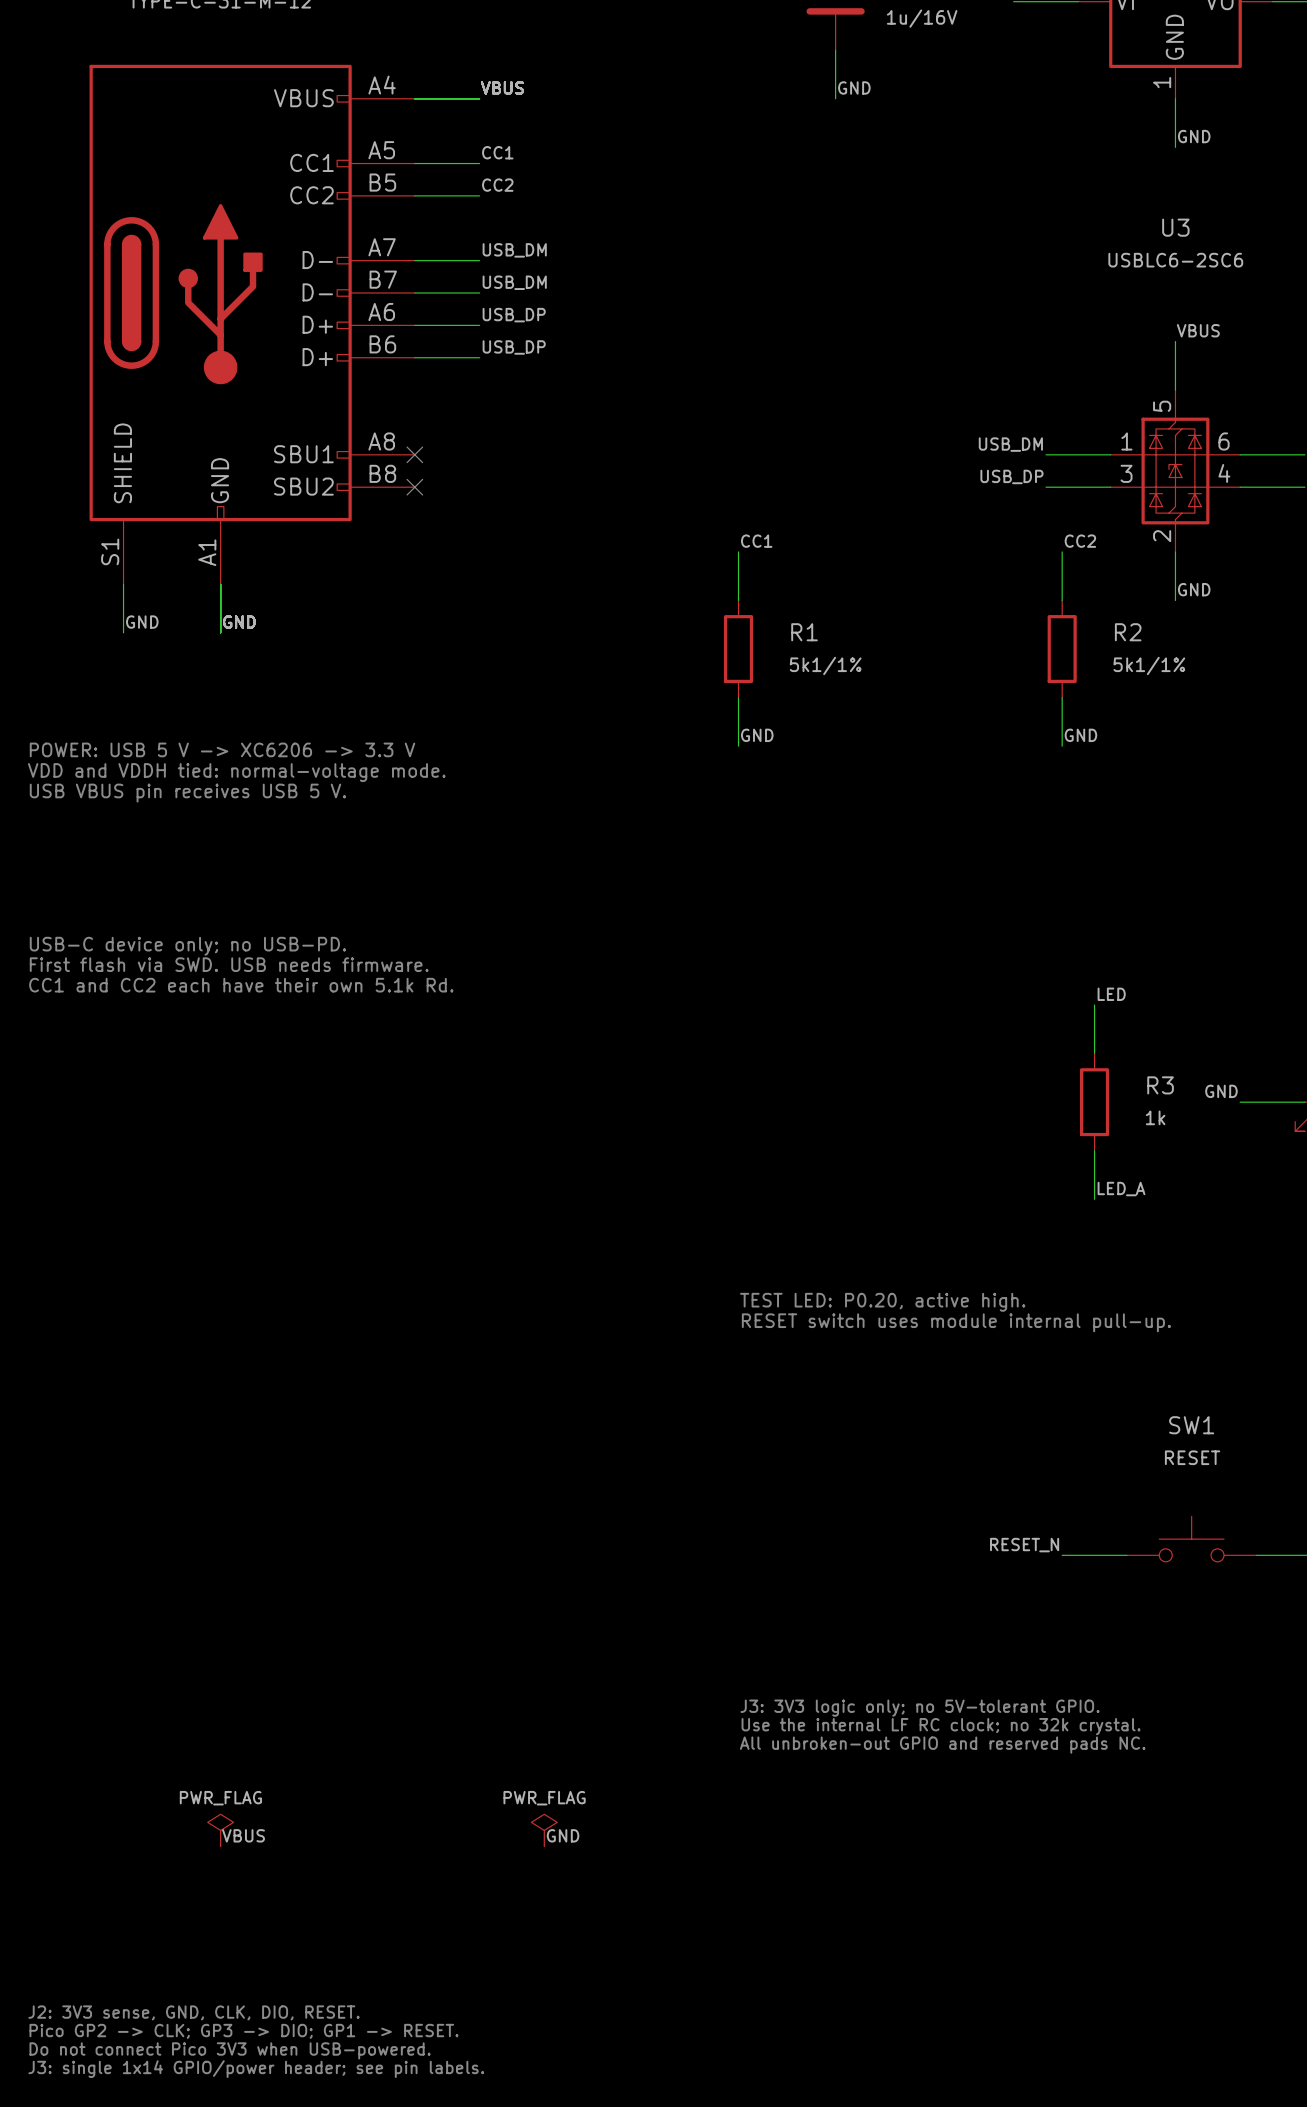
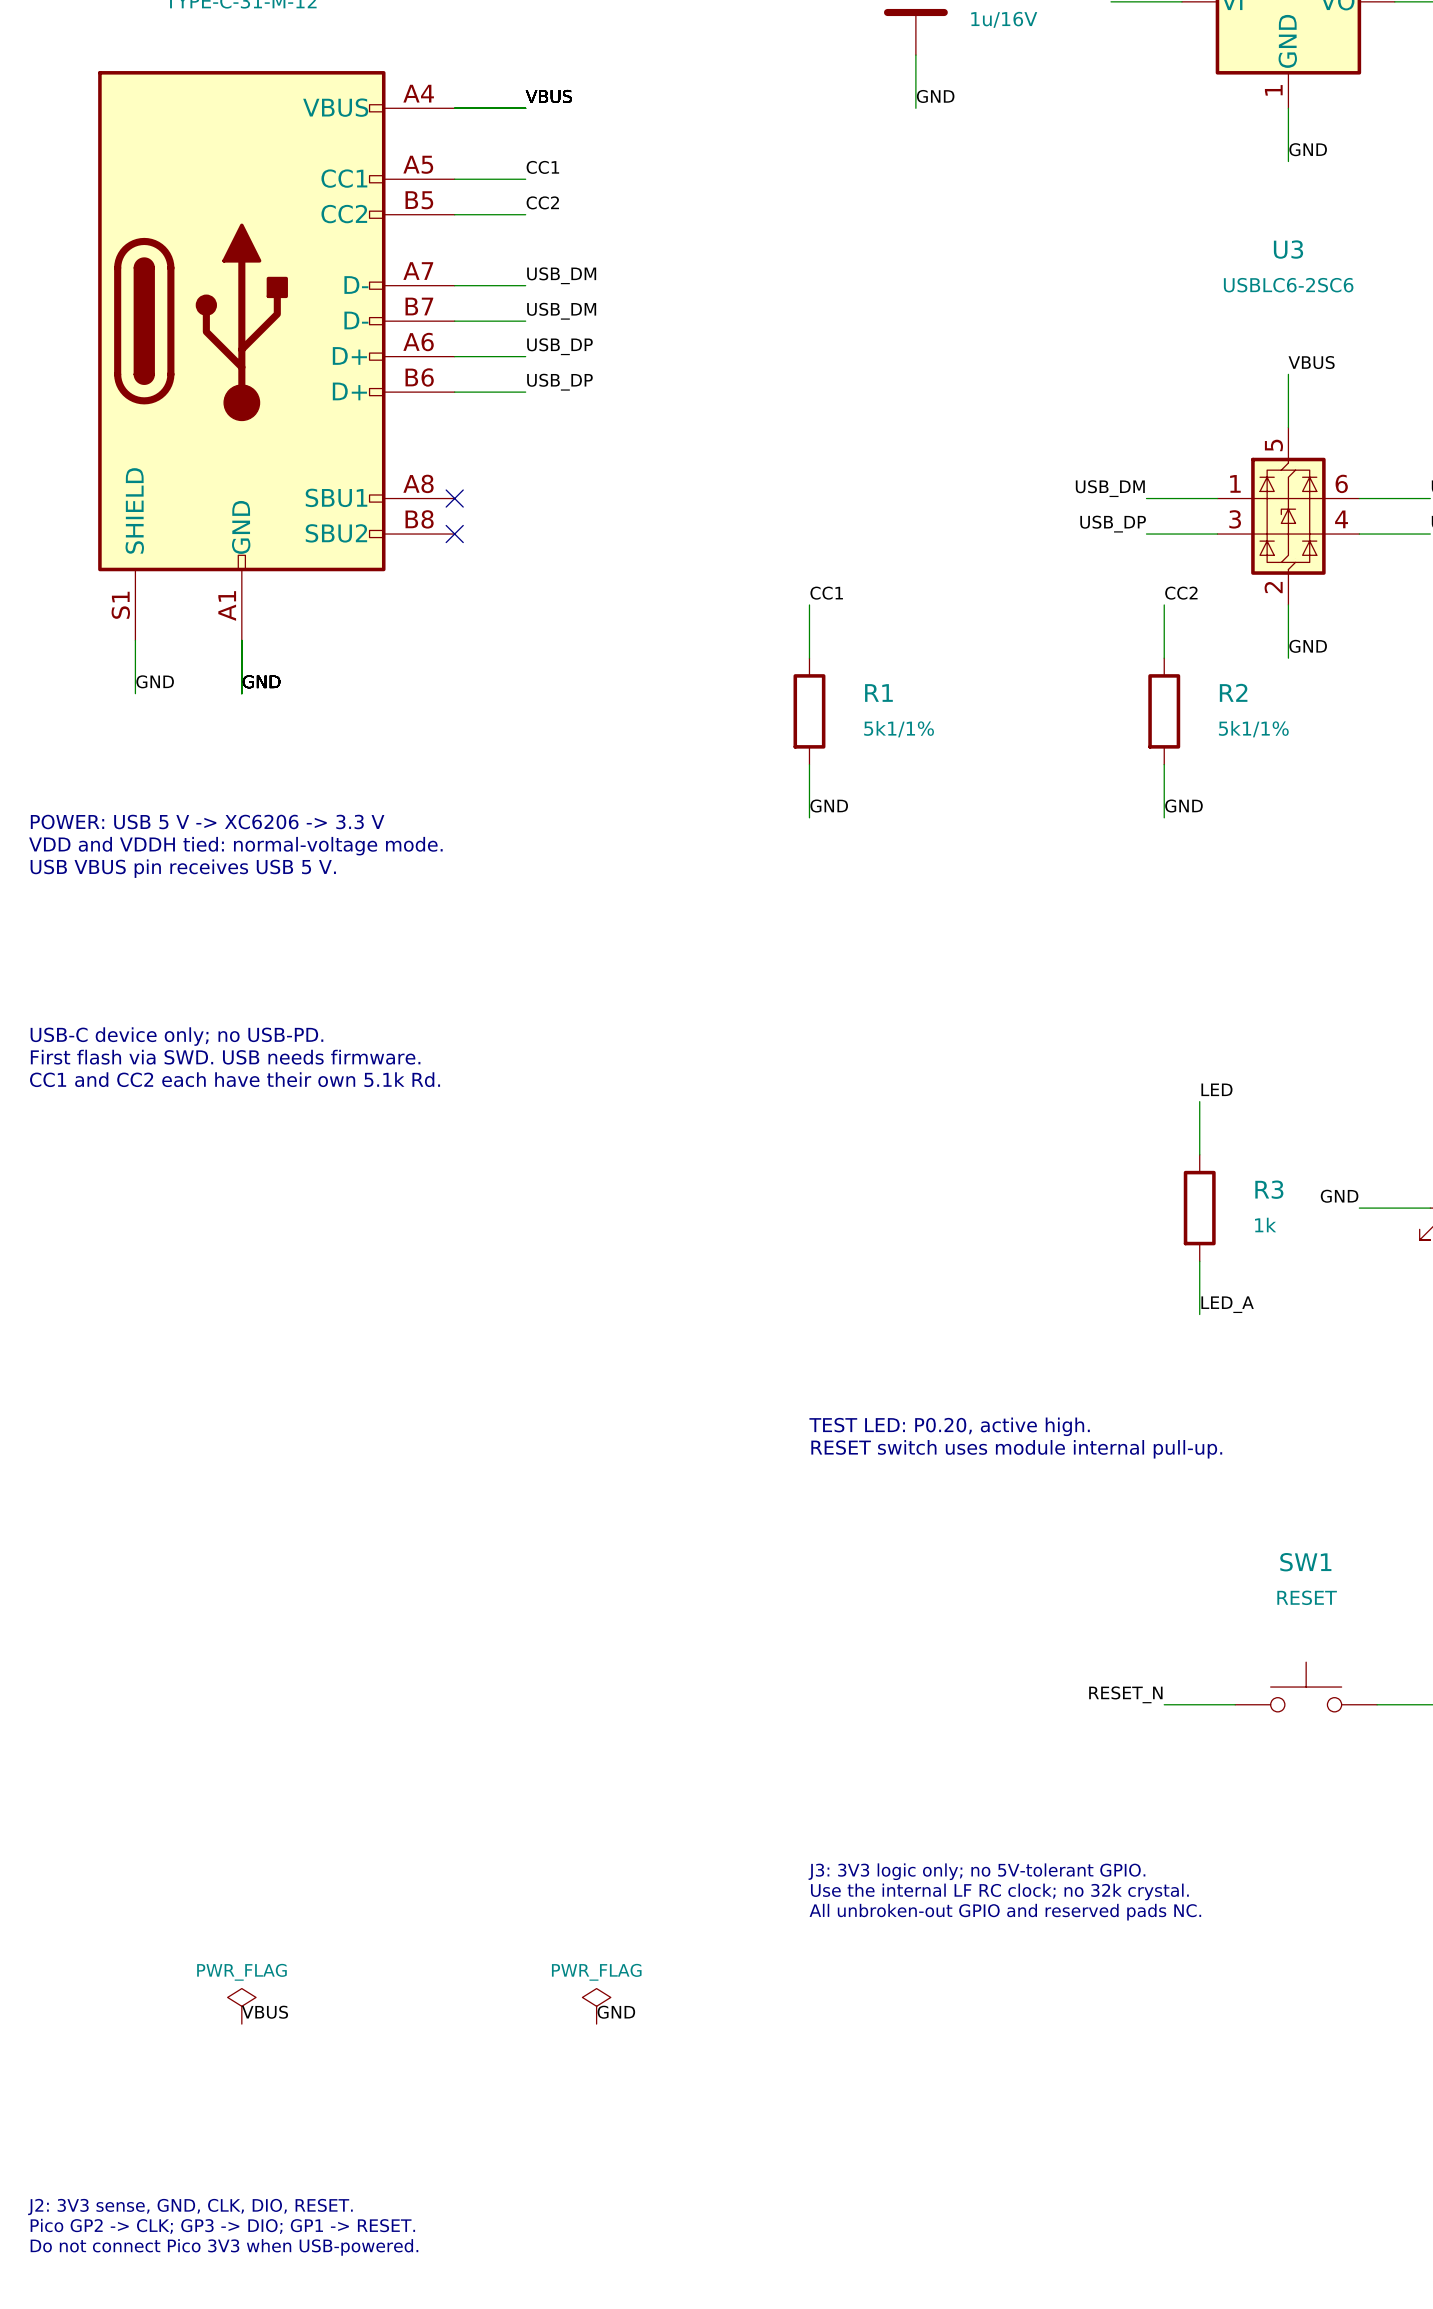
text: J3: single 1x14 GPIO/power header; see pin labels. (256, 2069) -> none

